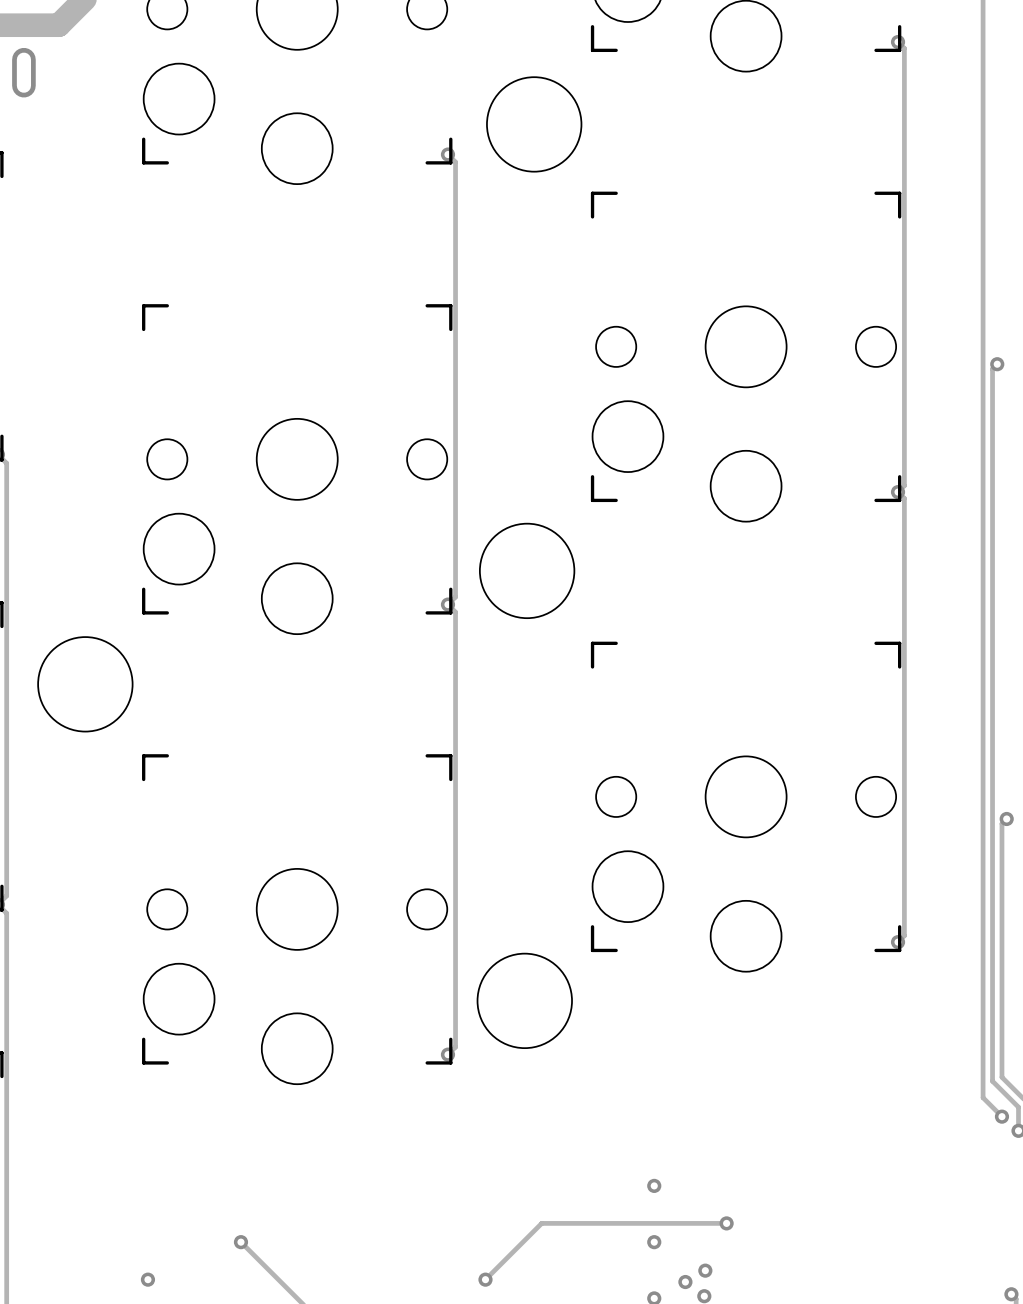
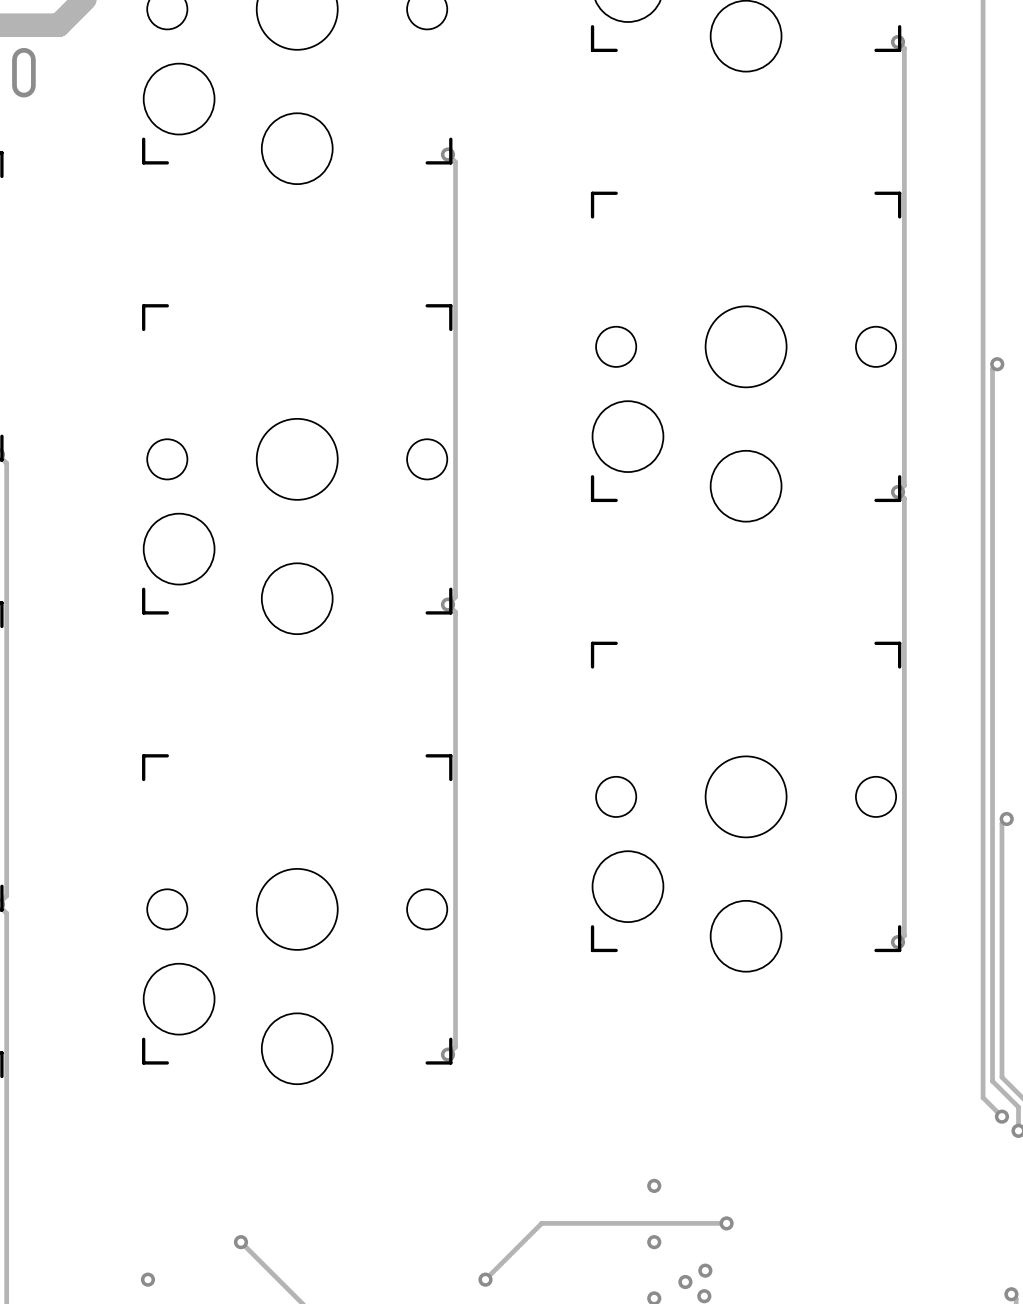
round board edge: [486, 76, 583, 173] -> none
round board edge: [479, 523, 575, 619] -> none
round board edge: [37, 636, 134, 733] -> none
round board edge: [476, 953, 573, 1049] -> none

